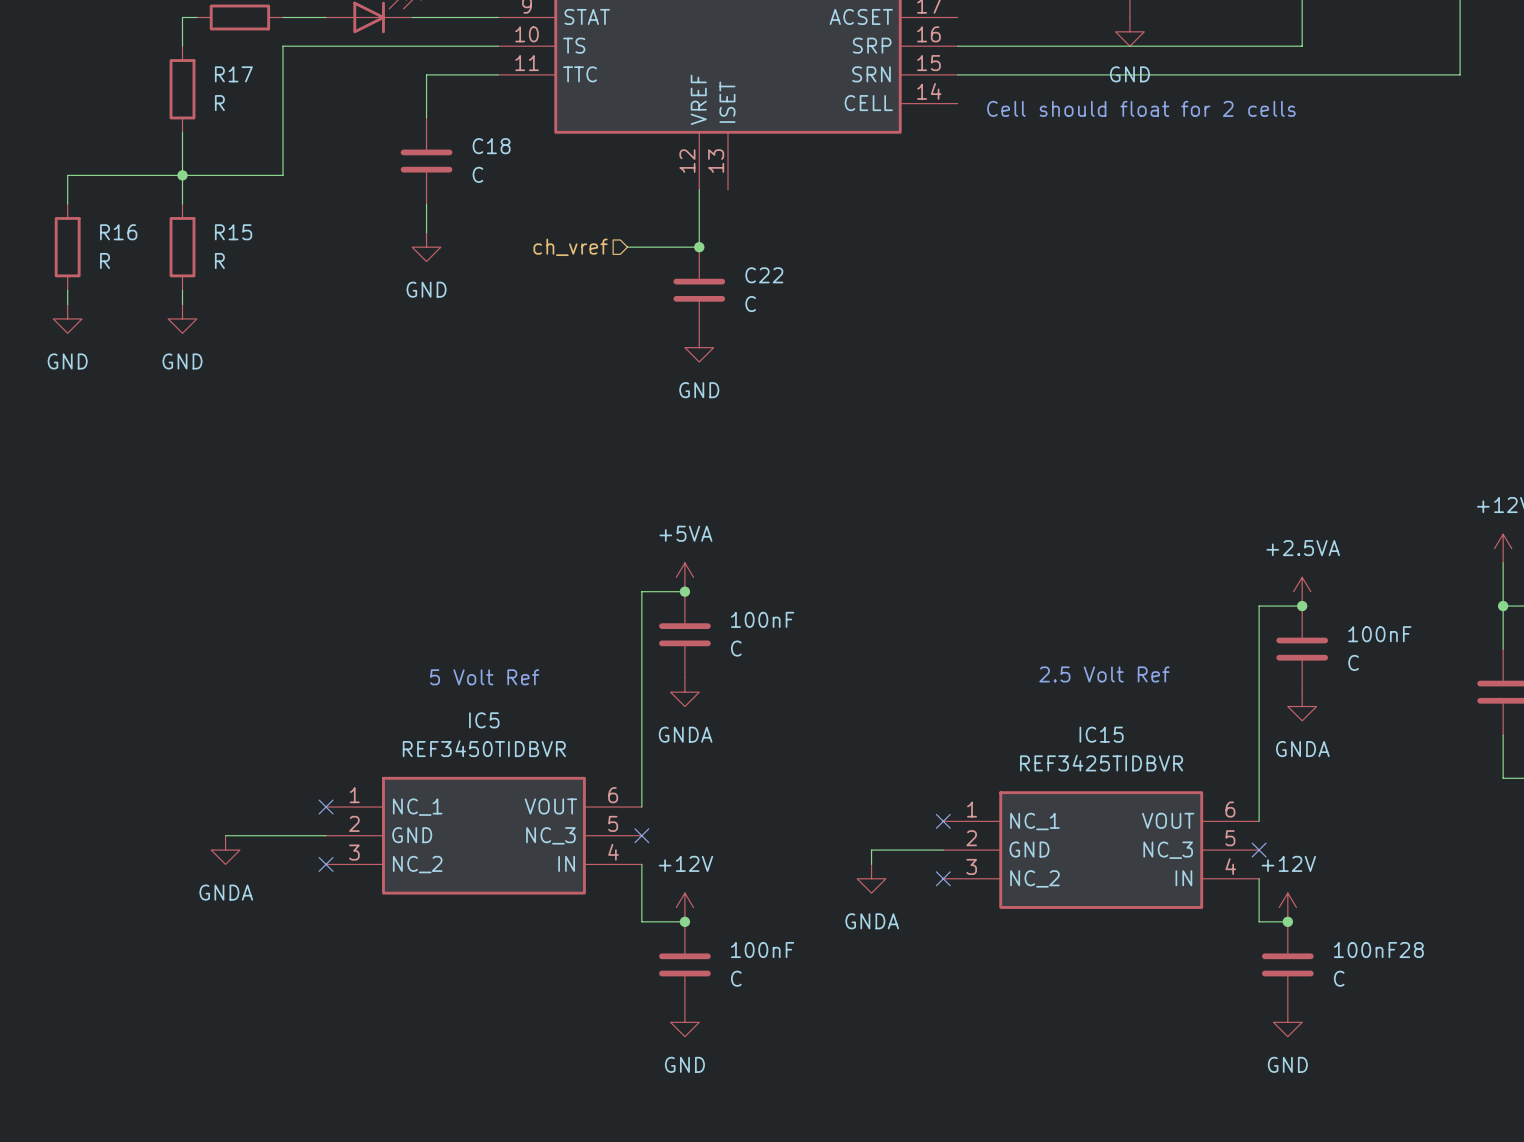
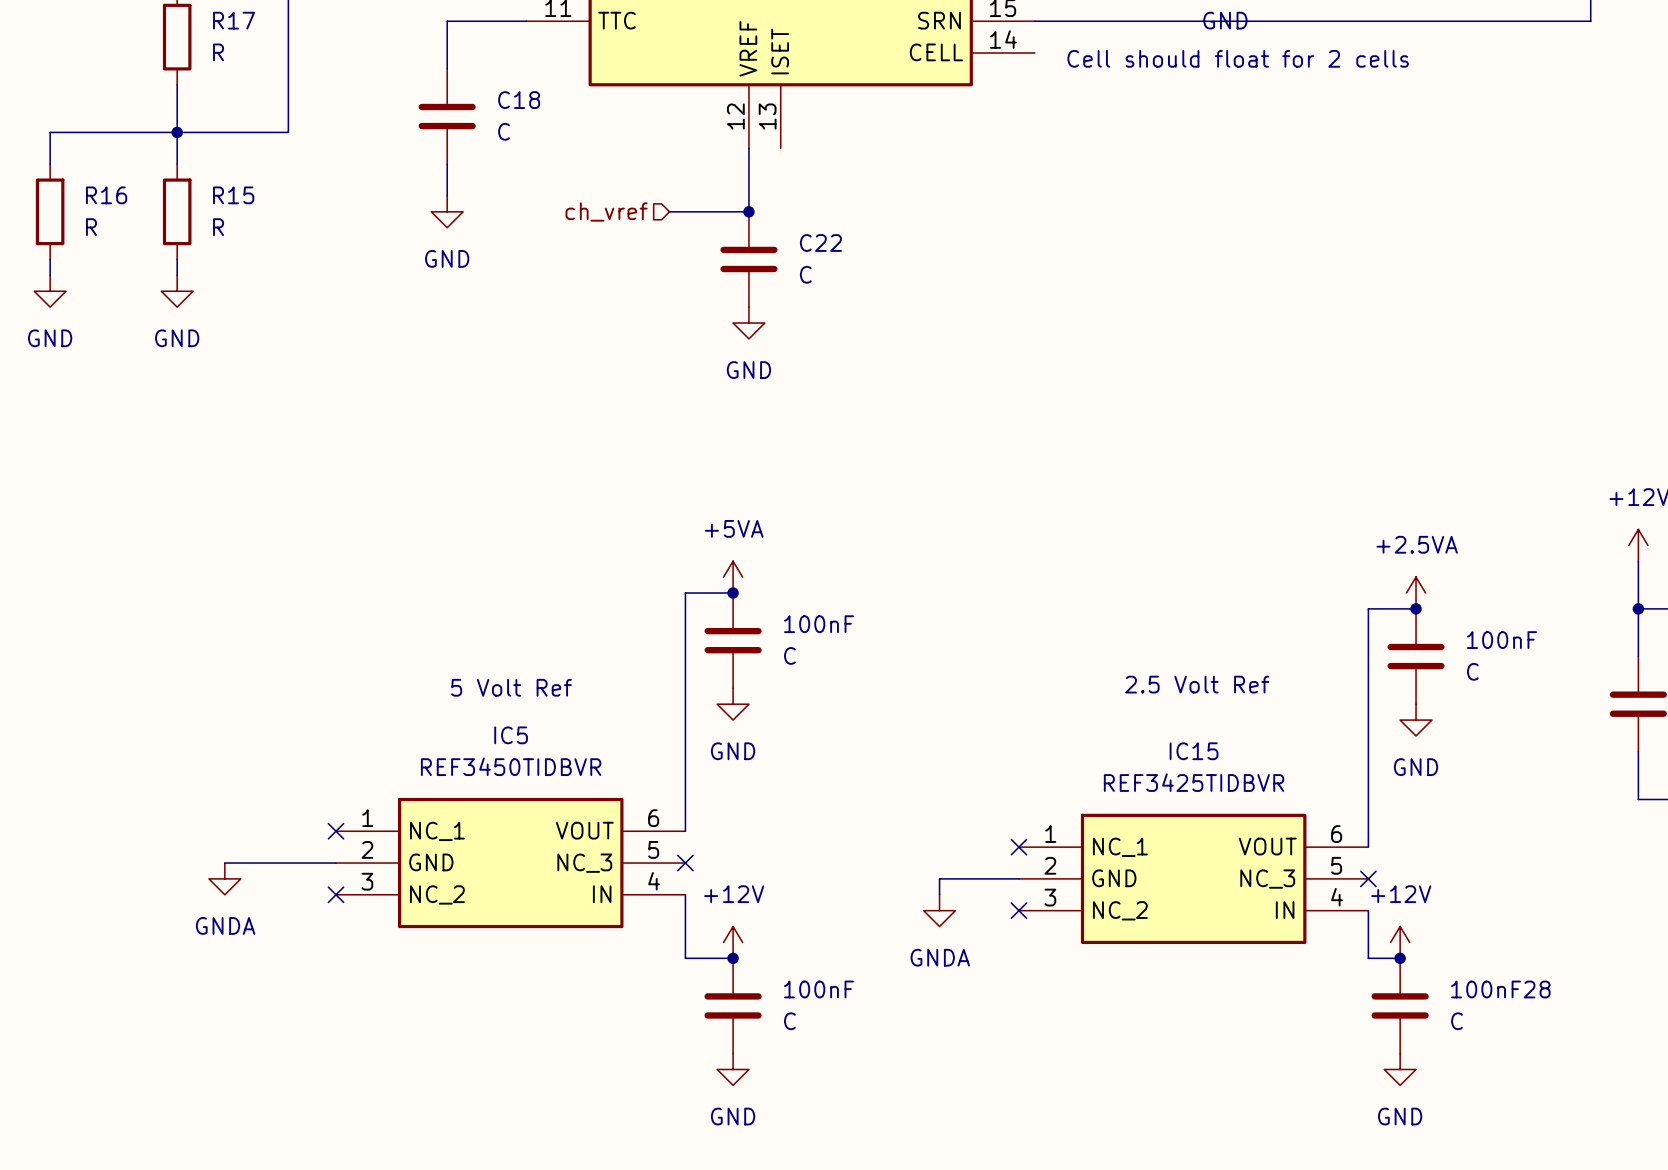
power symbol: GNDA (684, 692) -> GND (733, 704)
power symbol: GNDA (1302, 706) -> GND (1416, 720)

